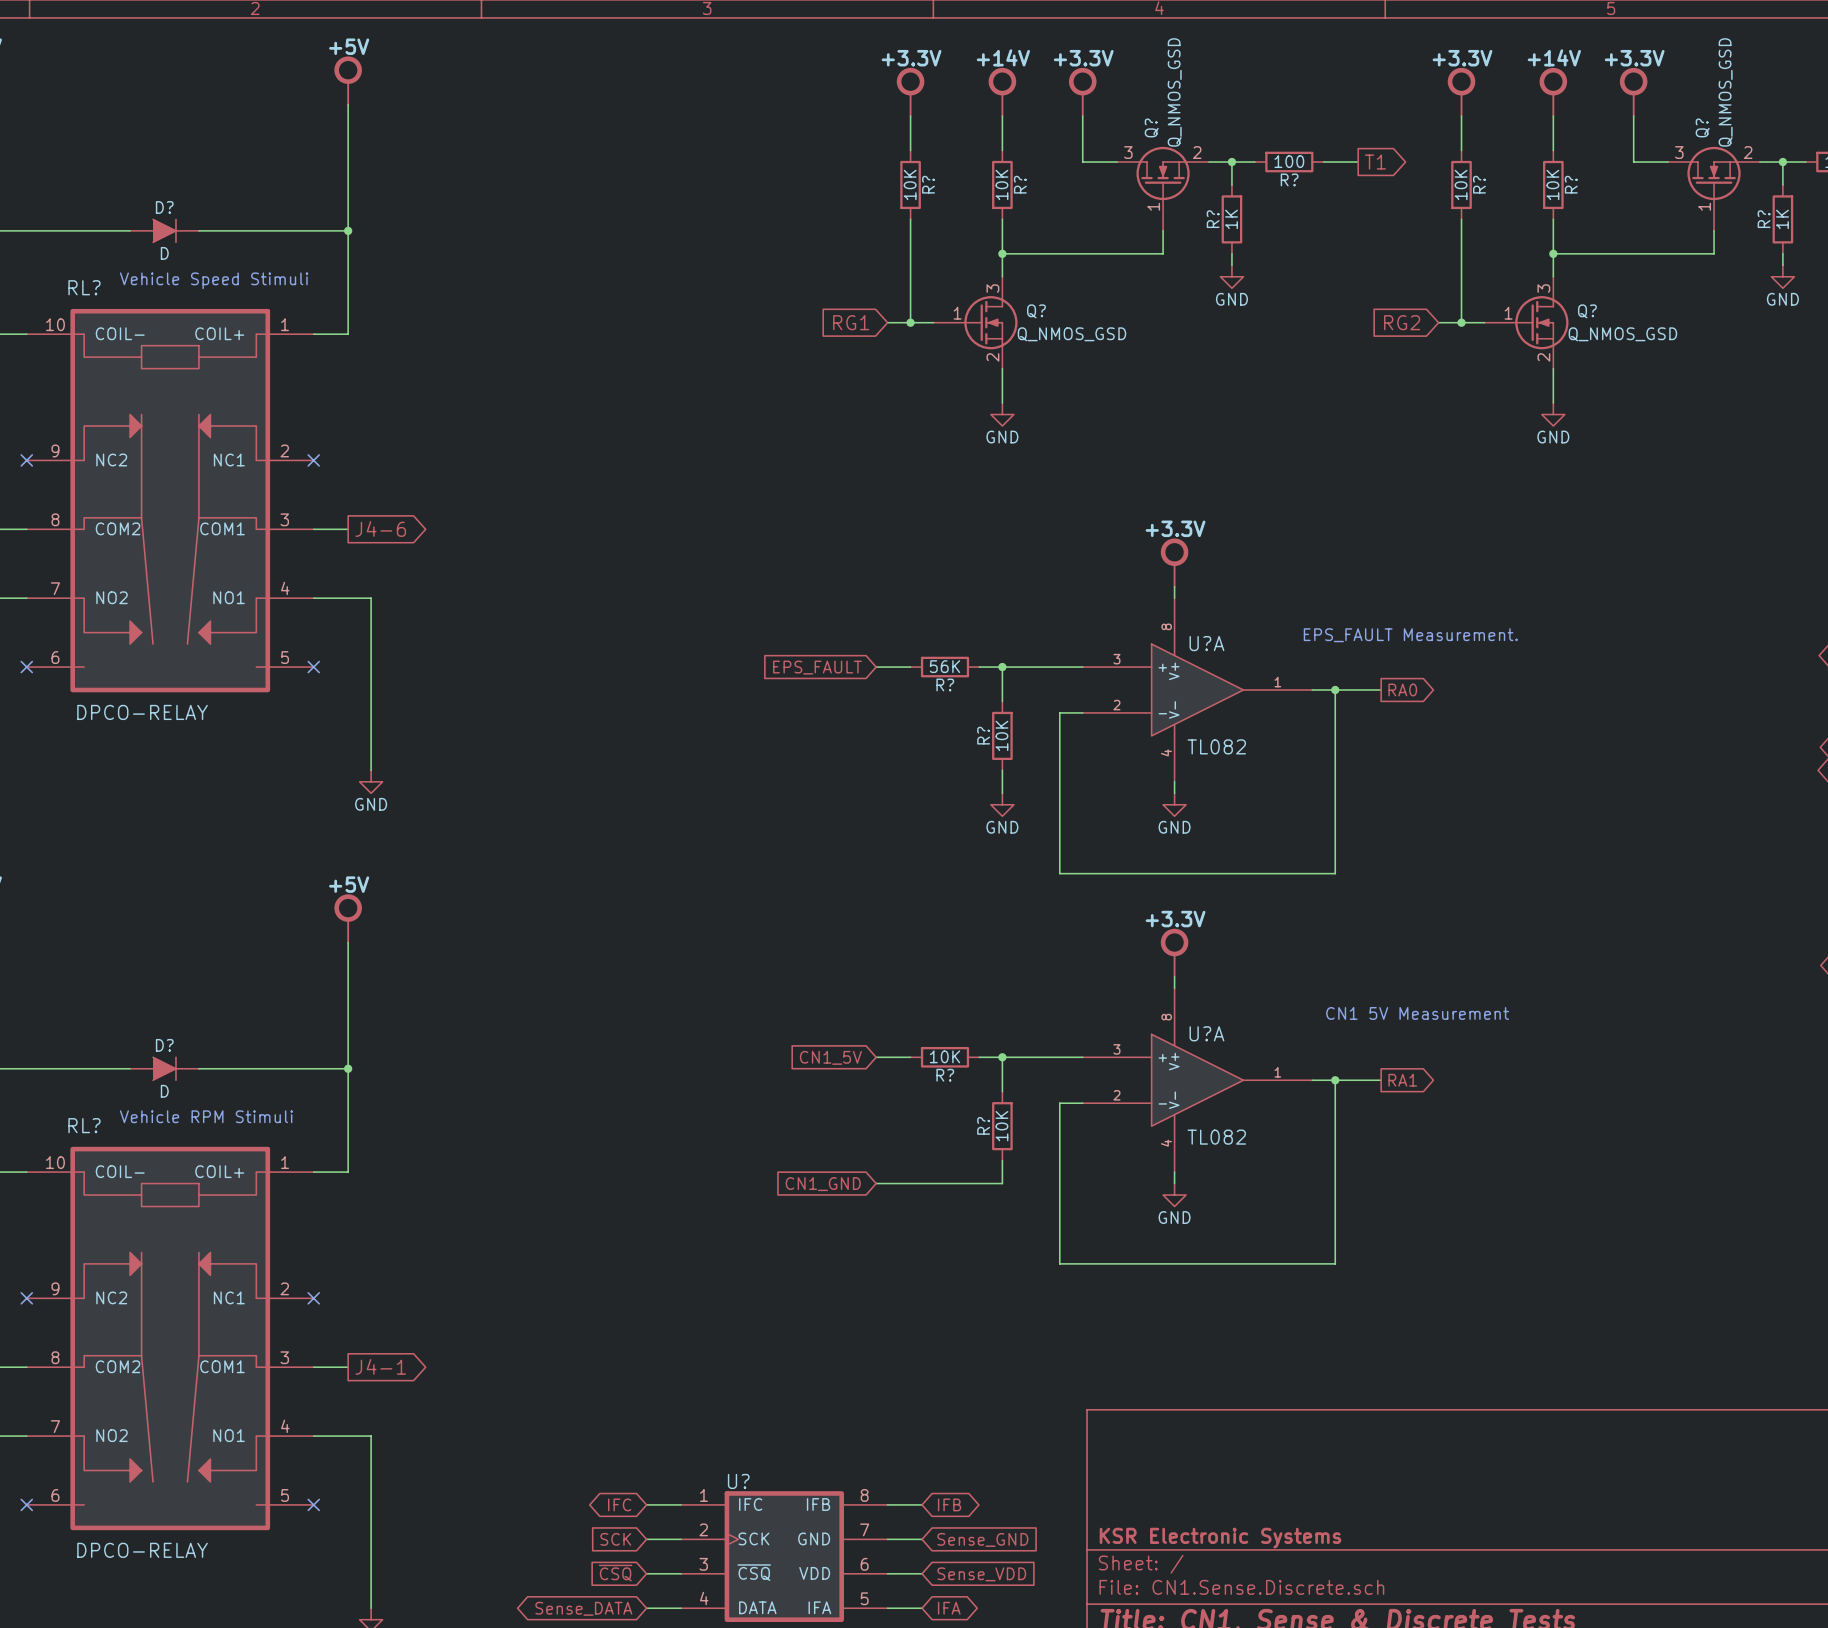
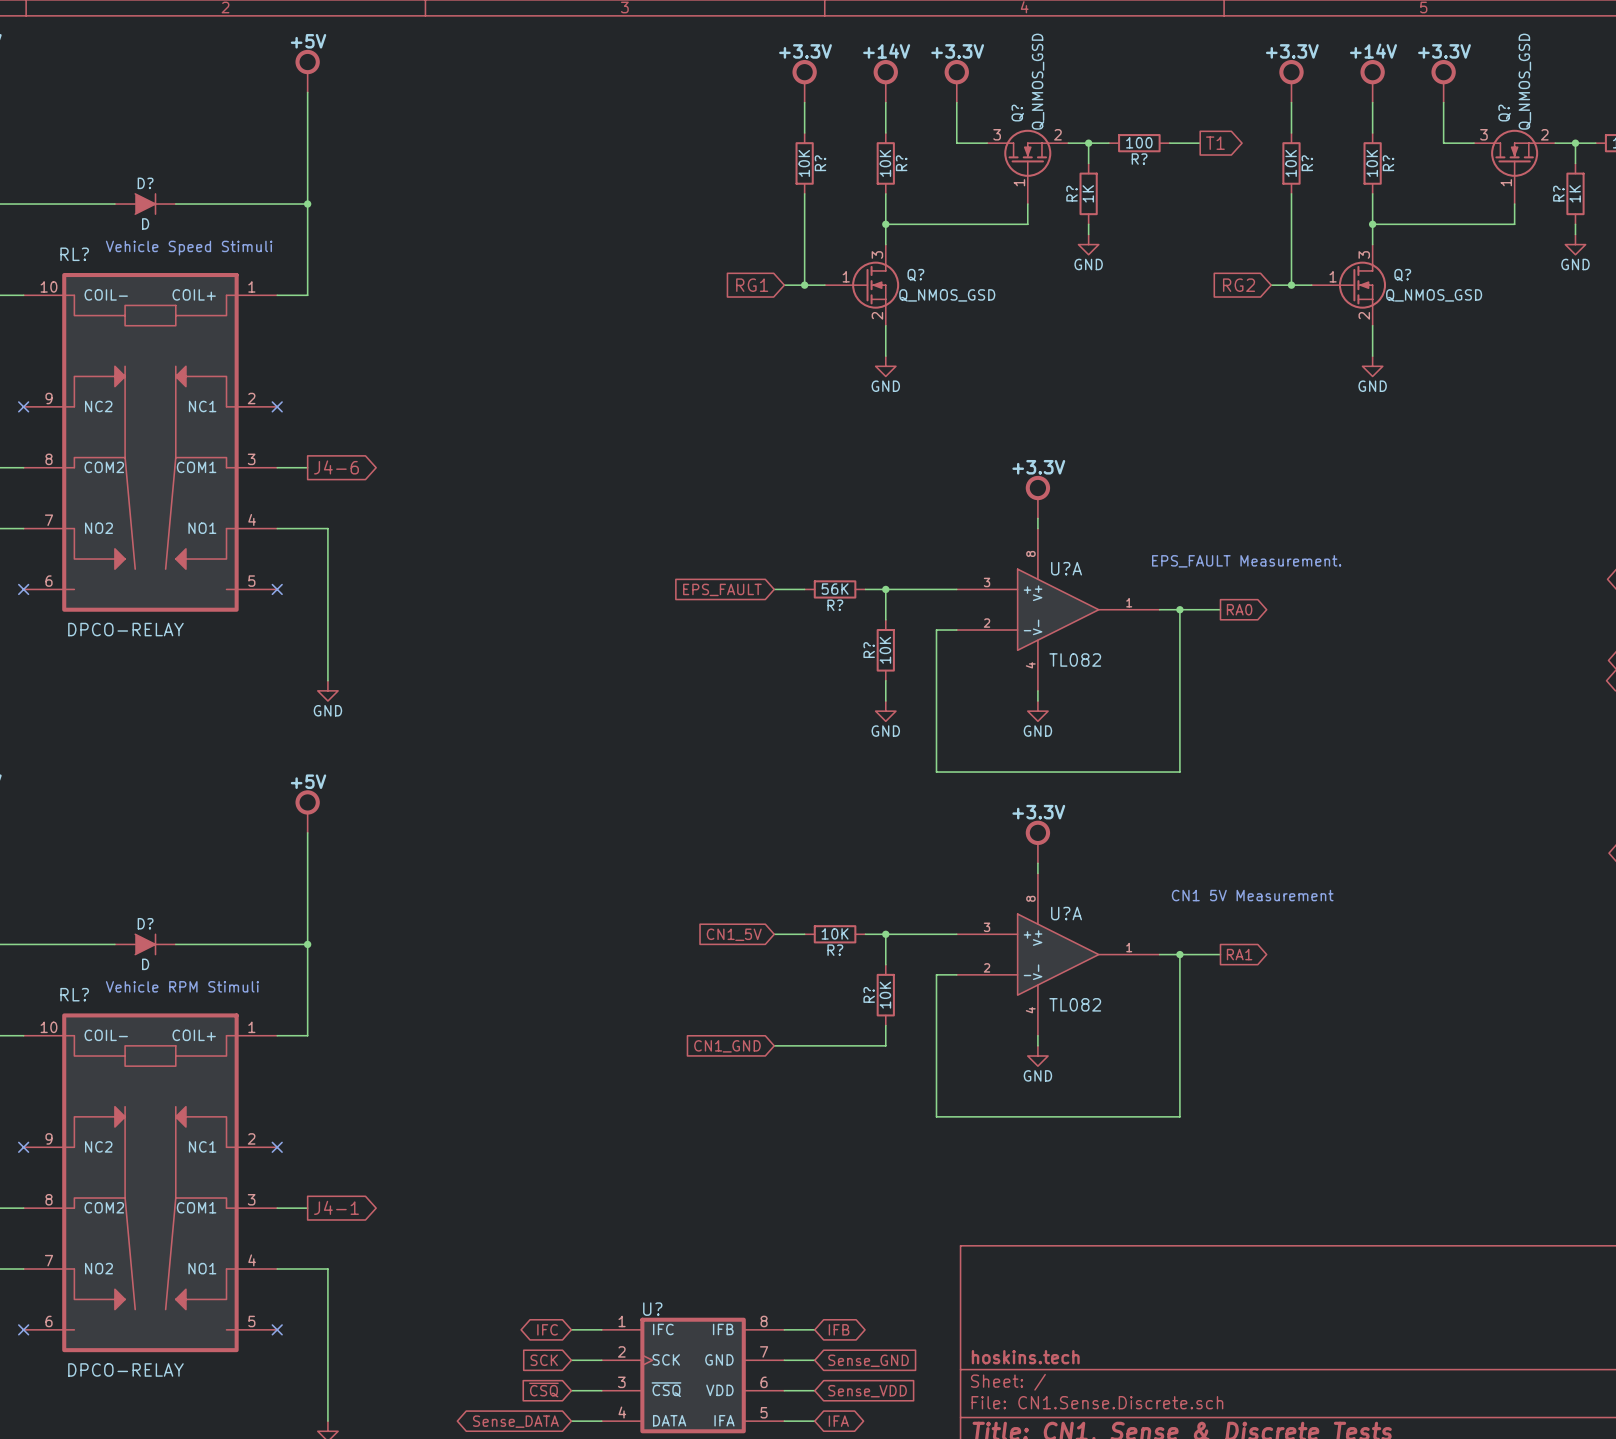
title block: KSR Electronic Systems (1220, 1538) -> hoskins.tech (1025, 1357)

